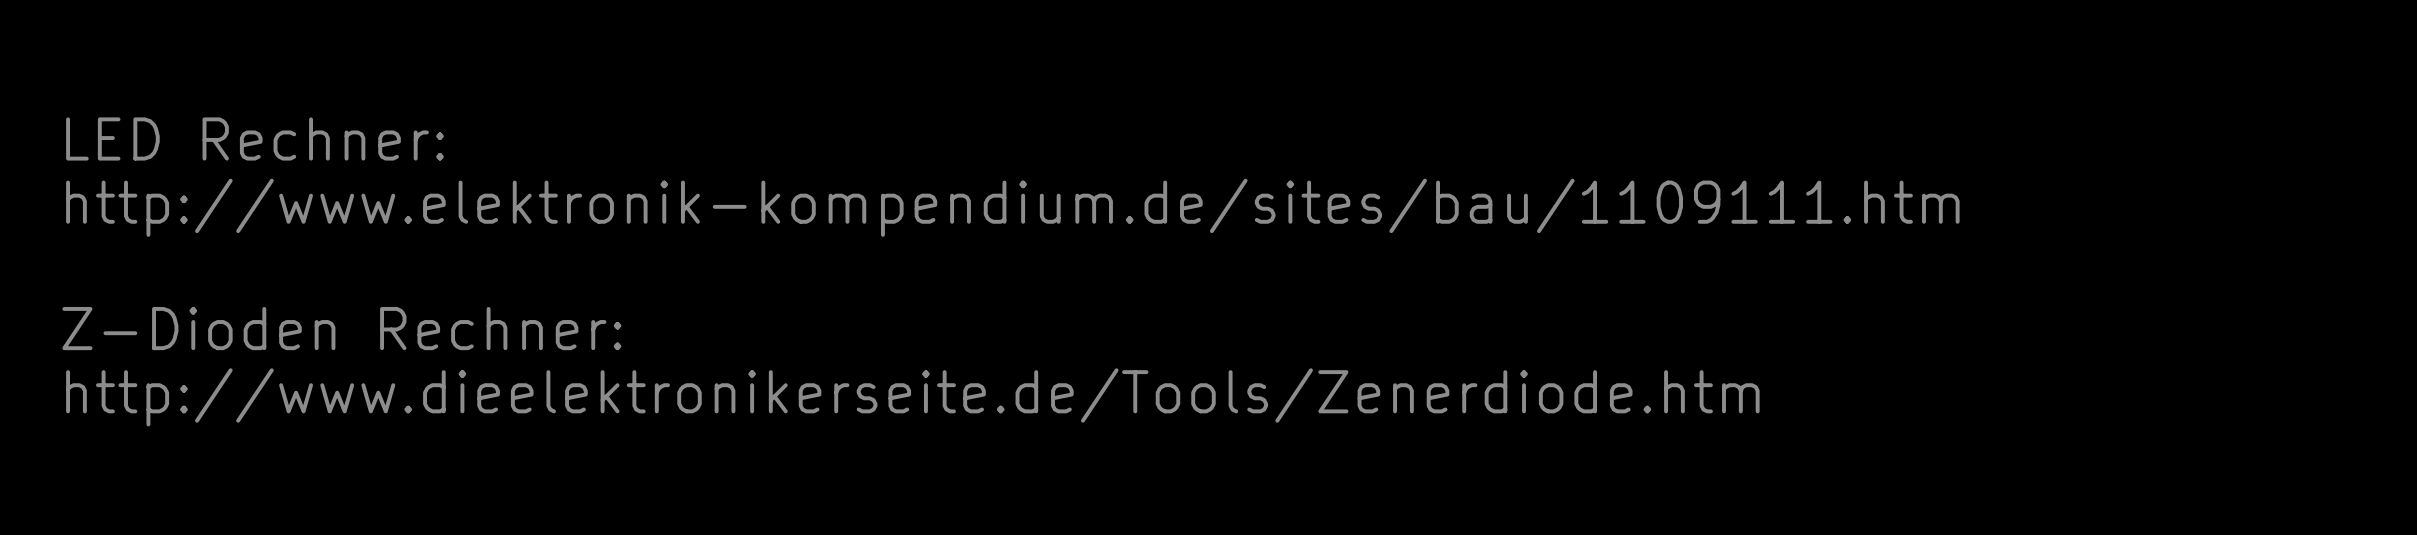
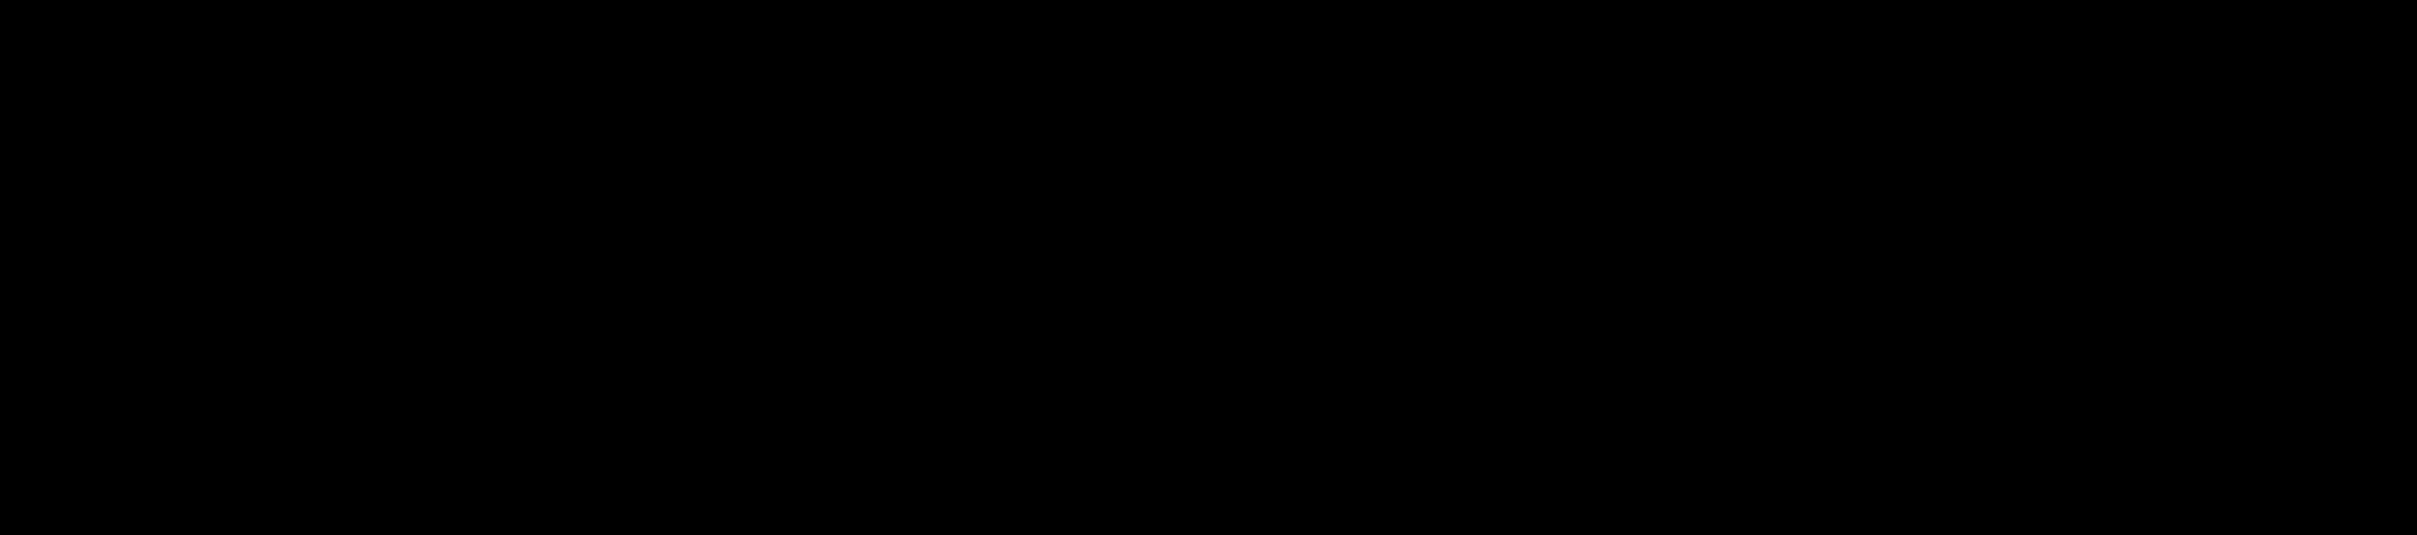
text: LED Rechner: (254, 138) -> none
text: http://www.elektronik-kompendium.de/sites/bau/1109111.htm (1012, 207) -> none
text: Z-Dioden Rechner: (341, 328) -> none
text: http://www.dieelektronikerseite.de/Tools/Zenerdiode.htm (912, 397) -> none

